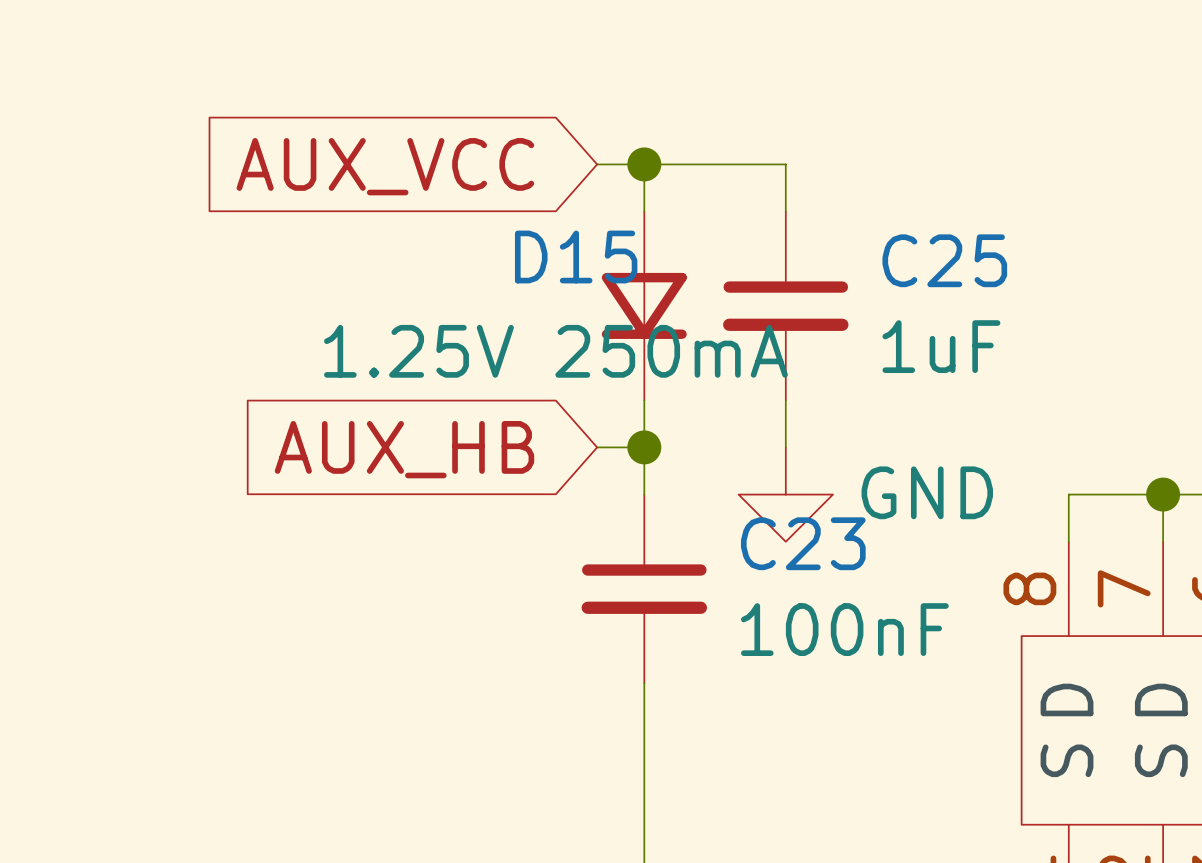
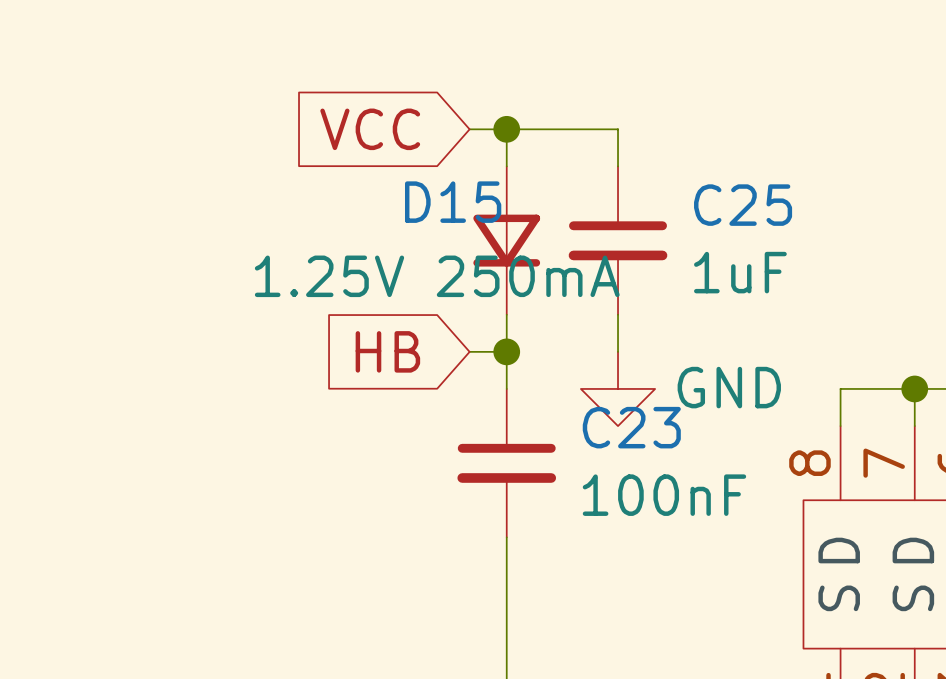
global label: AUX_VCC (385, 166) -> VCC (370, 129)
global label: AUX_HB (404, 449) -> HB (387, 351)

